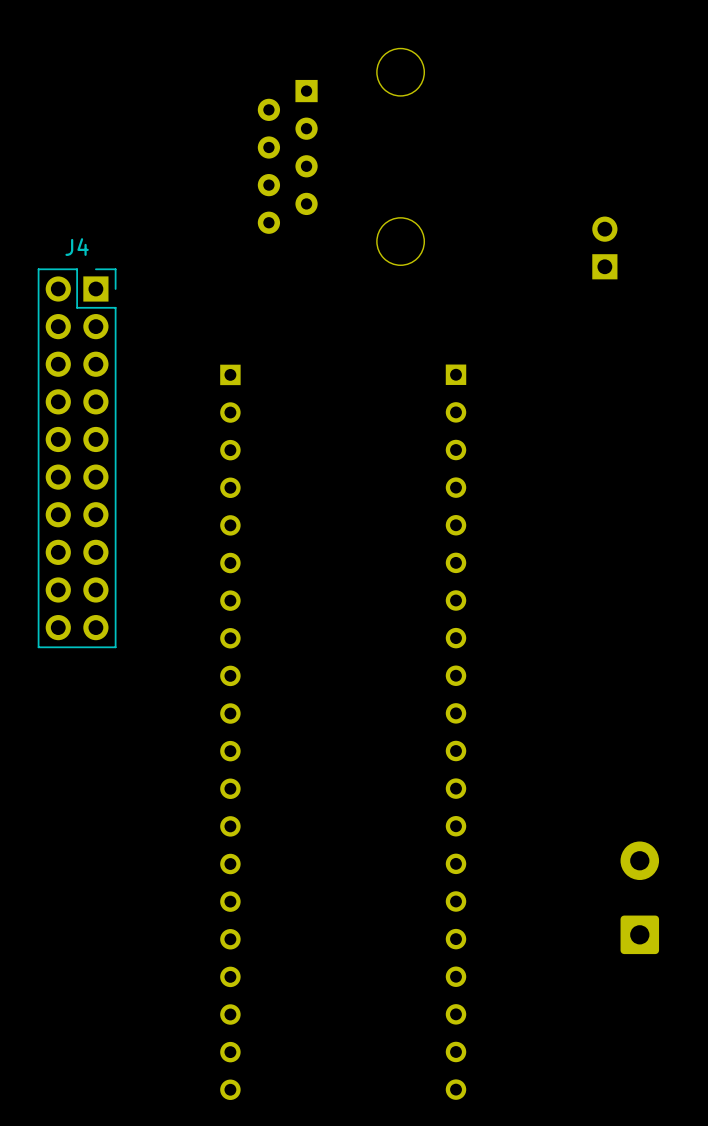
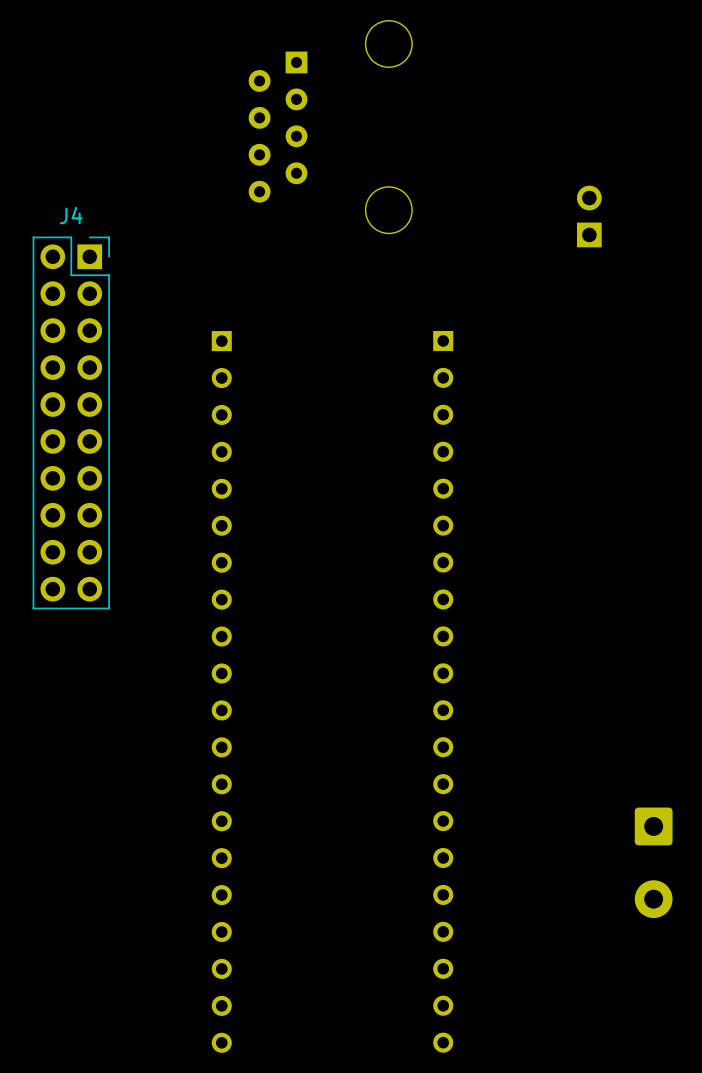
part rotation: 0° (639, 897) -> 180° (653, 862)

